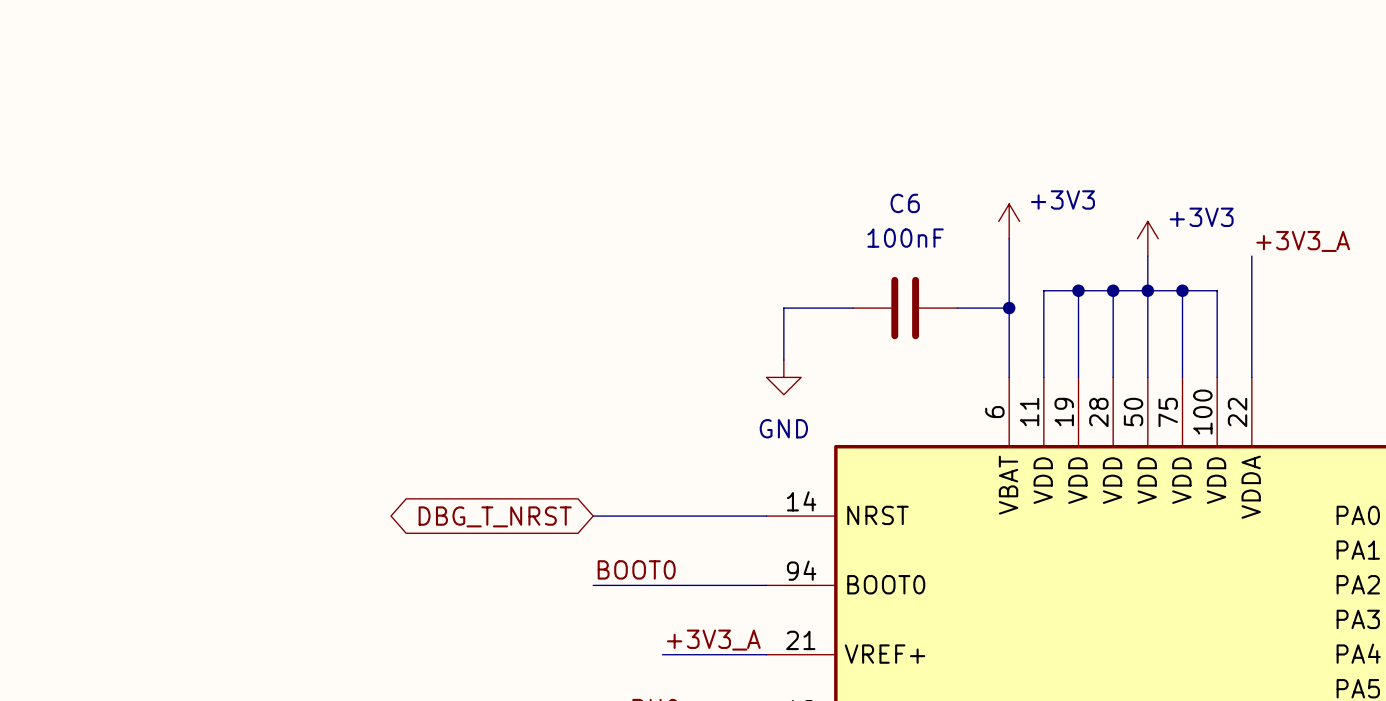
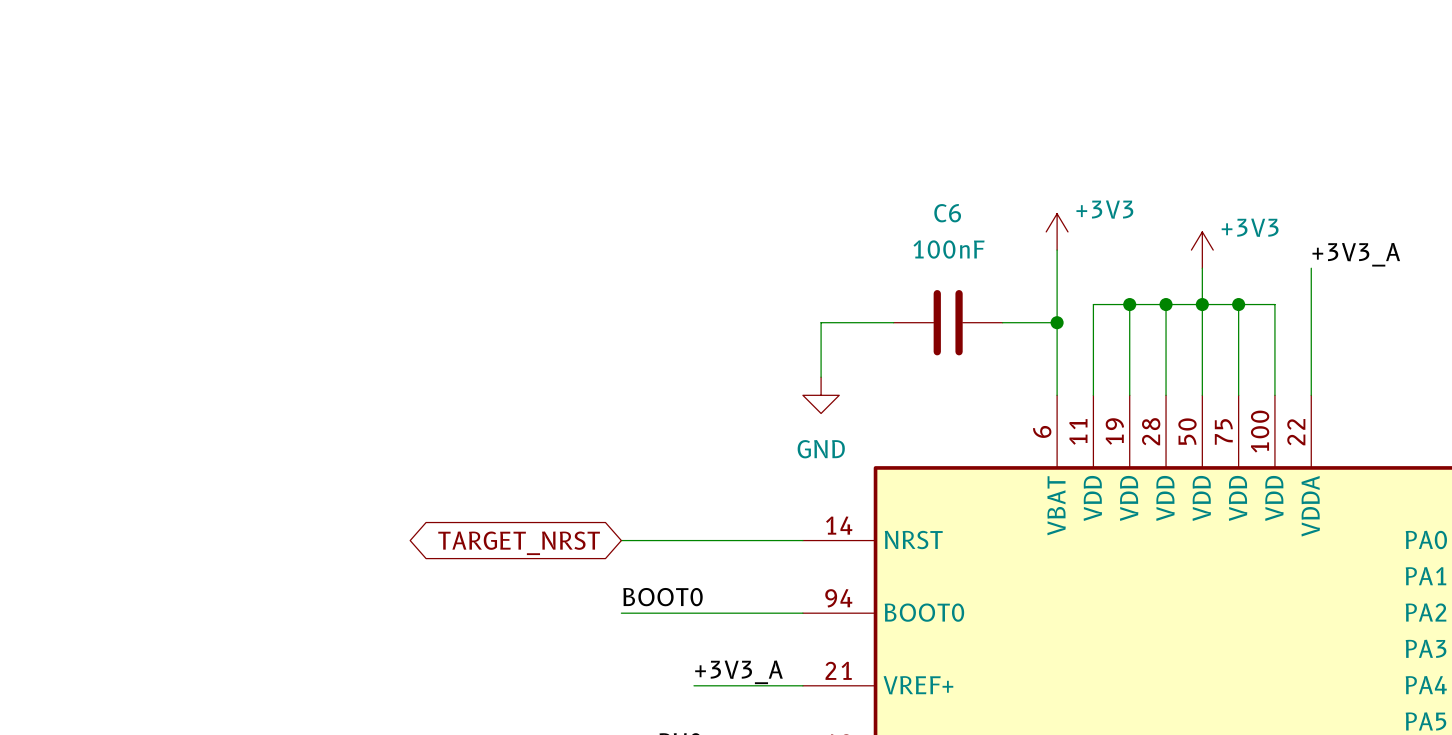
global label: DBG_T_NRST (495, 516) -> TARGET_NRST (519, 543)

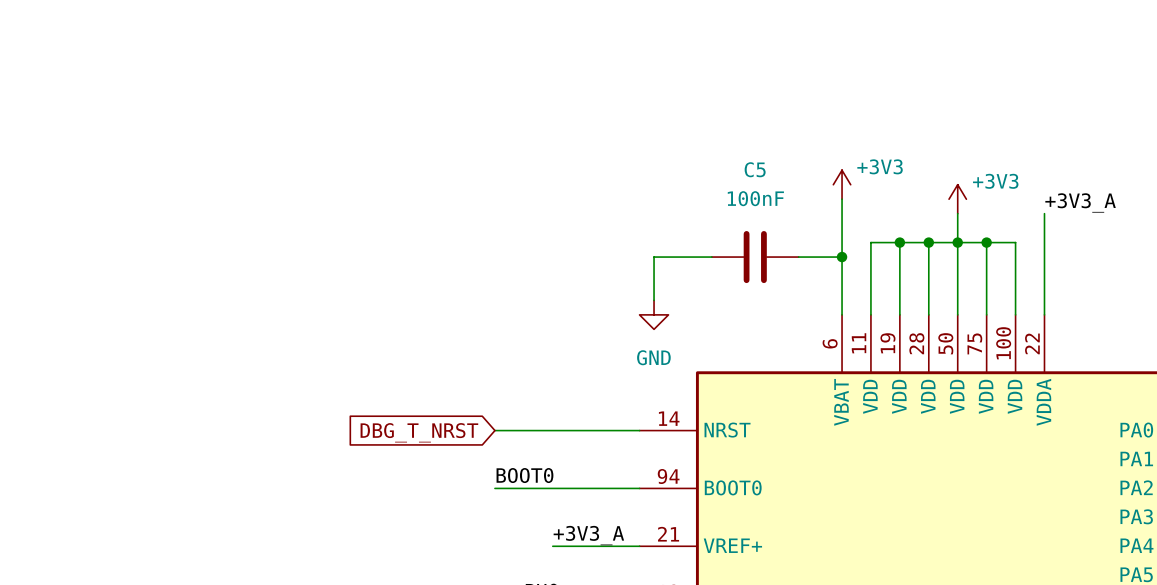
C6 name: C6 (947, 213) -> C5 (755, 169)
global label shape: bidirectional (519, 543) -> input (419, 432)
global label: TARGET_NRST (519, 543) -> DBG_T_NRST (419, 432)

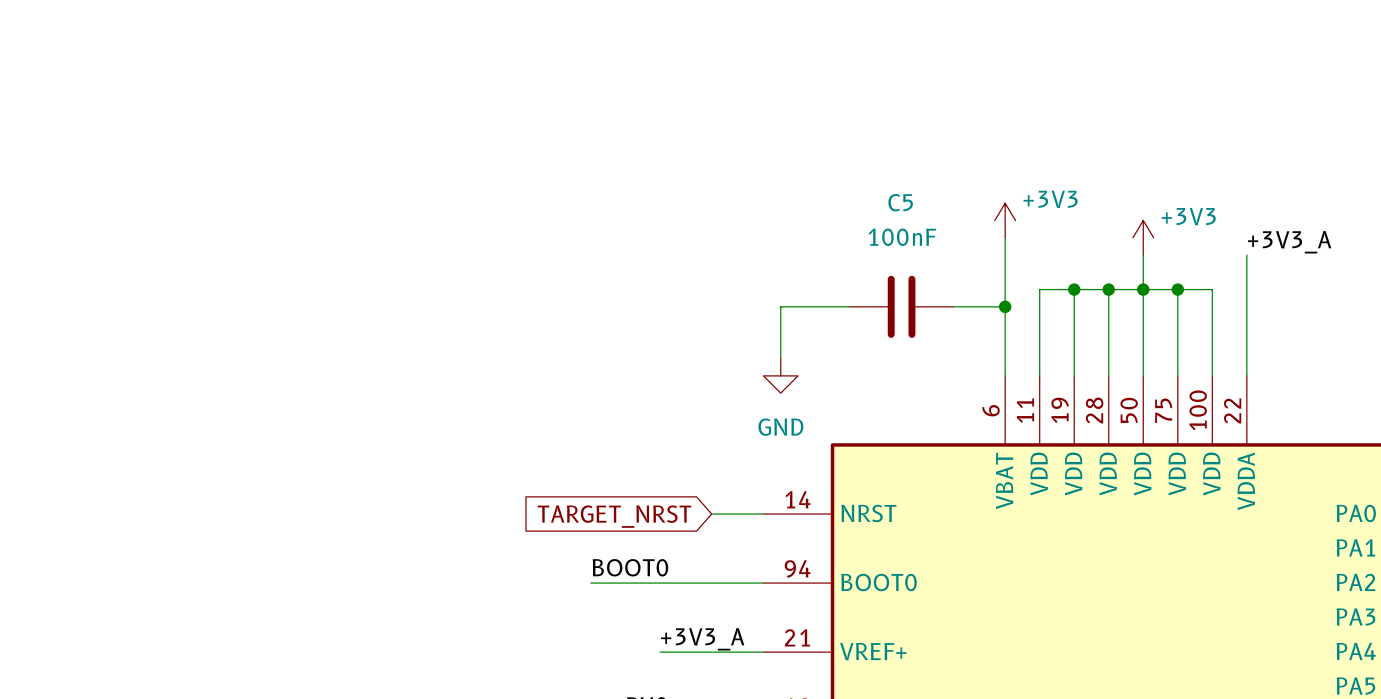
wire: (494, 430) (596, 430) -> none
global label: DBG_T_NRST (419, 432) -> TARGET_NRST (614, 516)

